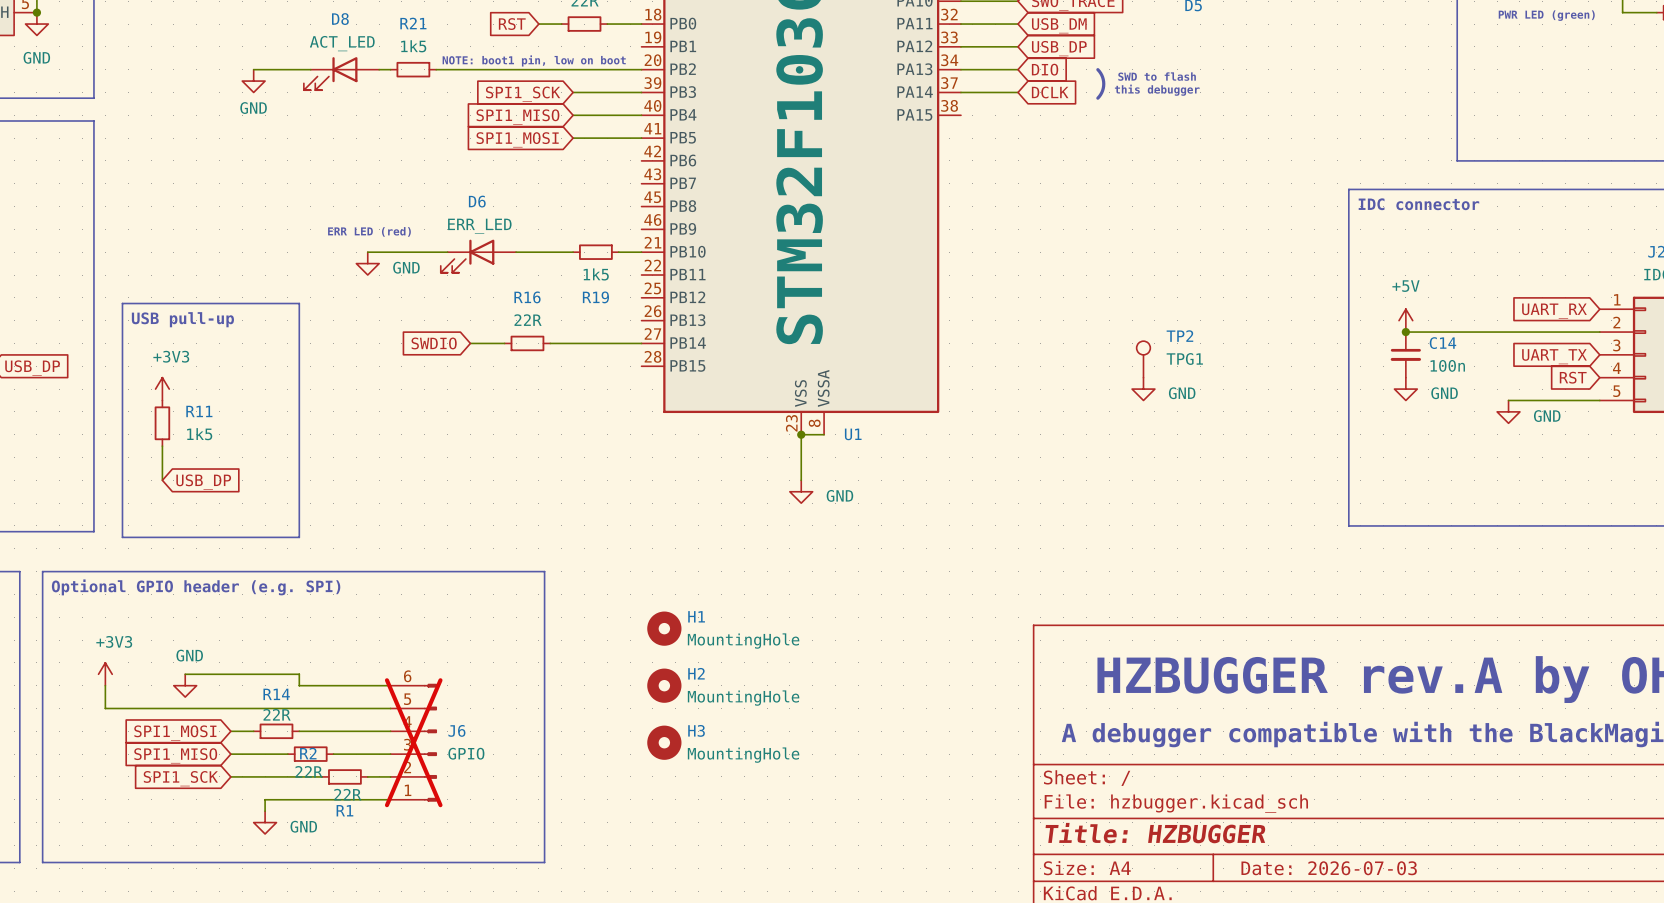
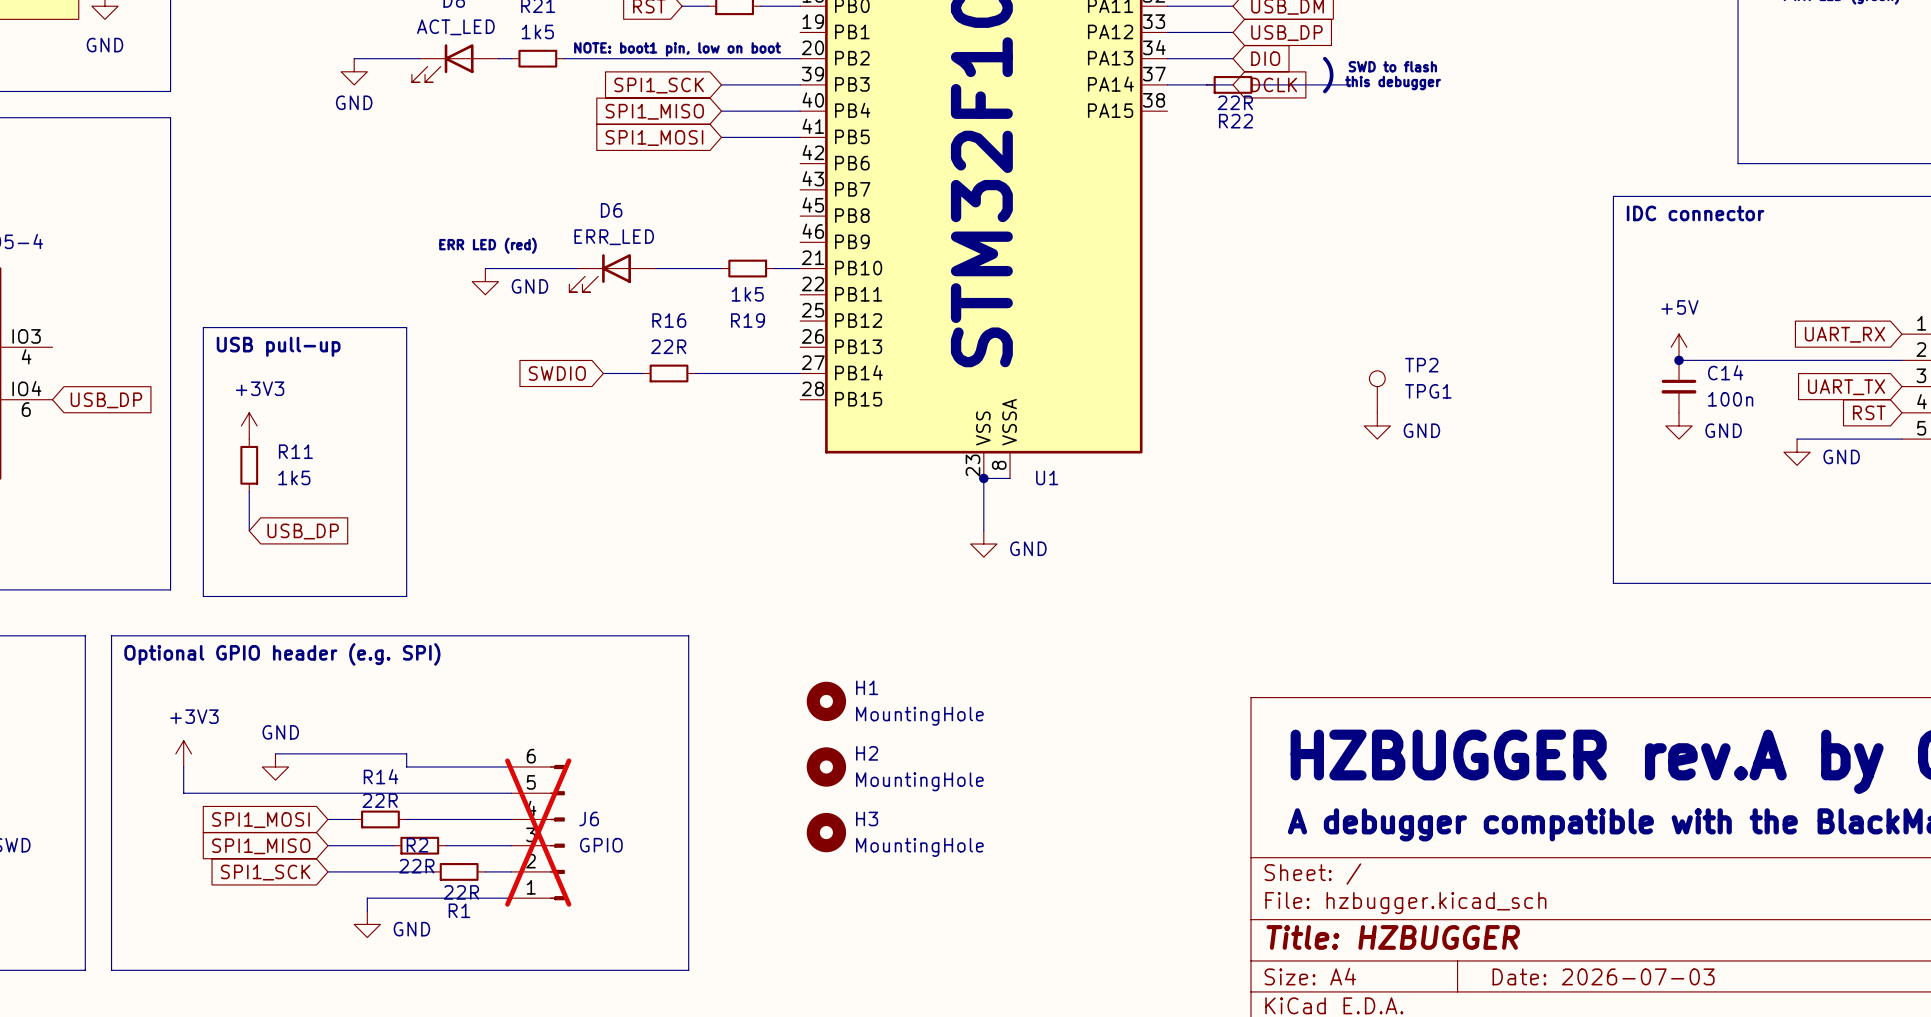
R22: none -> 22R (1233, 84)
wire: none -> (1259, 84) (1351, 84)

